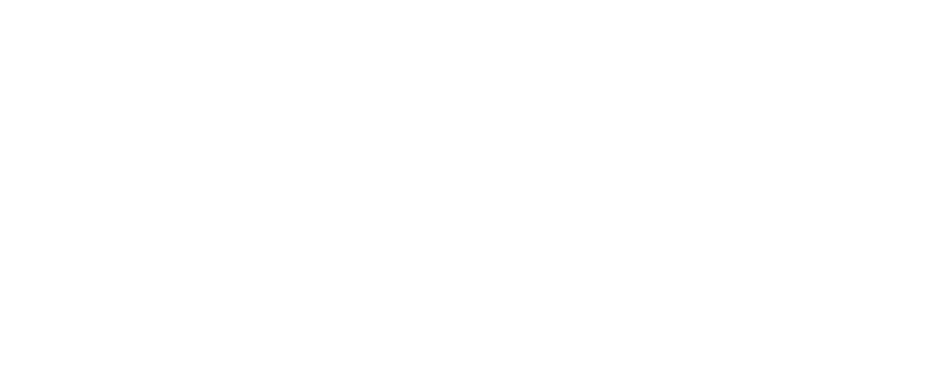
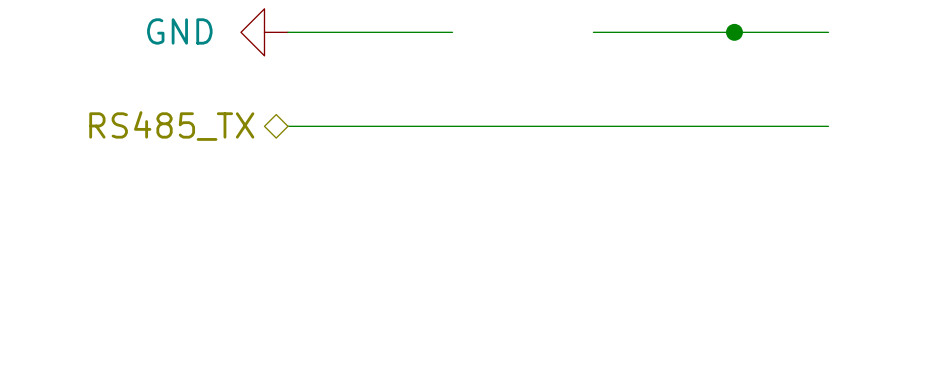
power symbol: none -> GND (264, 32)
wire: none -> (287, 32) (452, 32)
wire: none -> (593, 32) (828, 32)
junction: none -> (734, 32)
wire: none -> (287, 126) (828, 126)
hierarchical label: none -> RS485_TX (171, 126)

